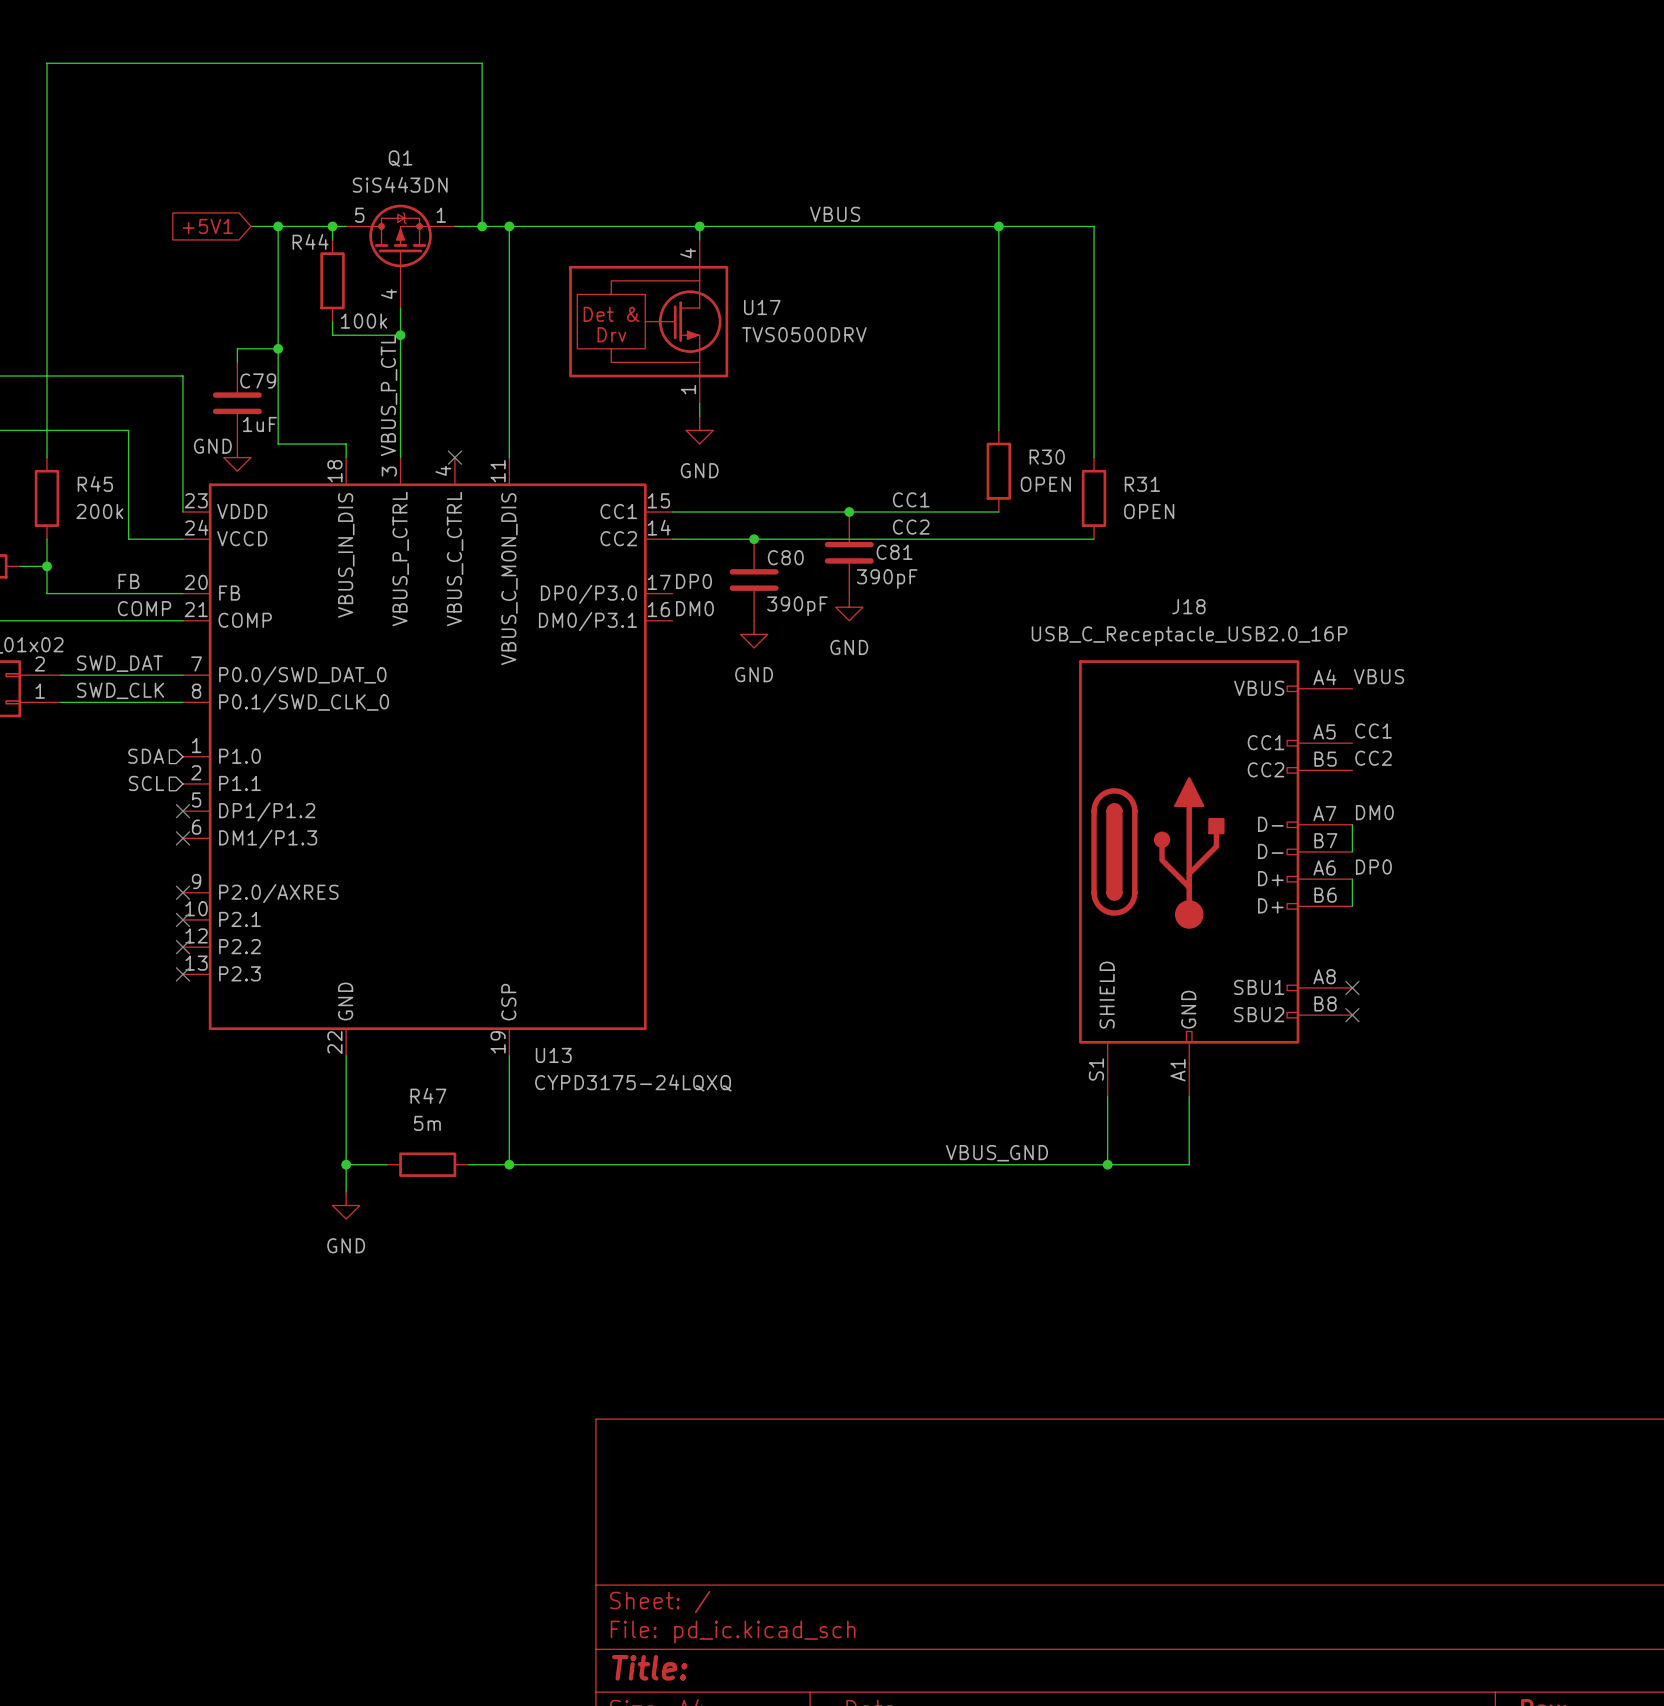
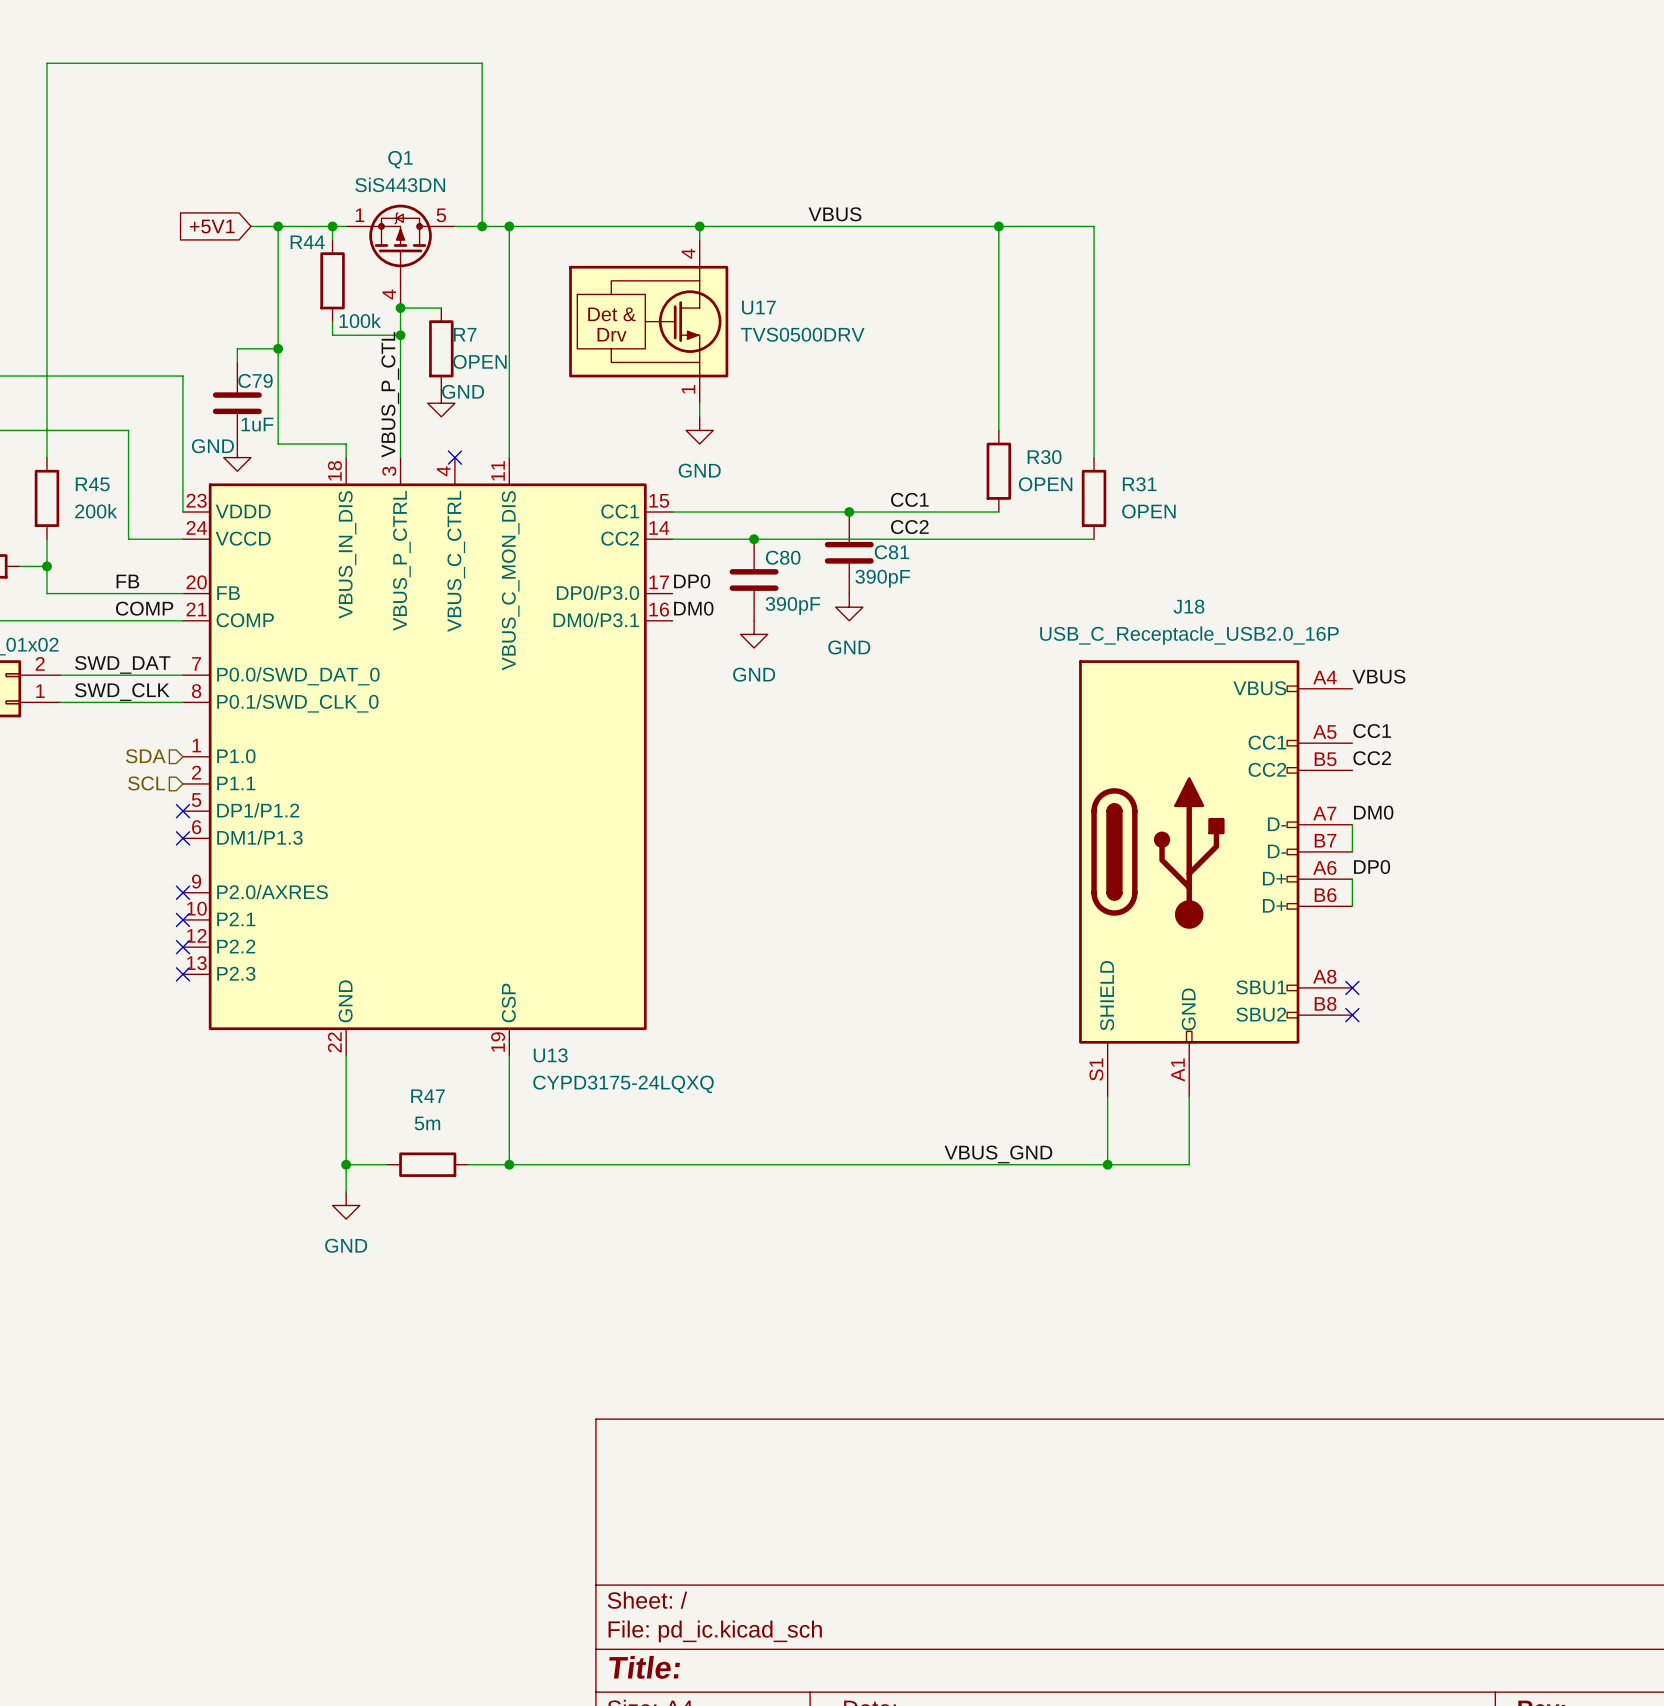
Q1 flip: as is (400, 242) -> left-right (400, 242)
wire: none -> (400, 308) (441, 308)
junction: none -> (400, 308)
R7: none -> OPEN (441, 348)
power symbol: none -> GND (441, 403)

